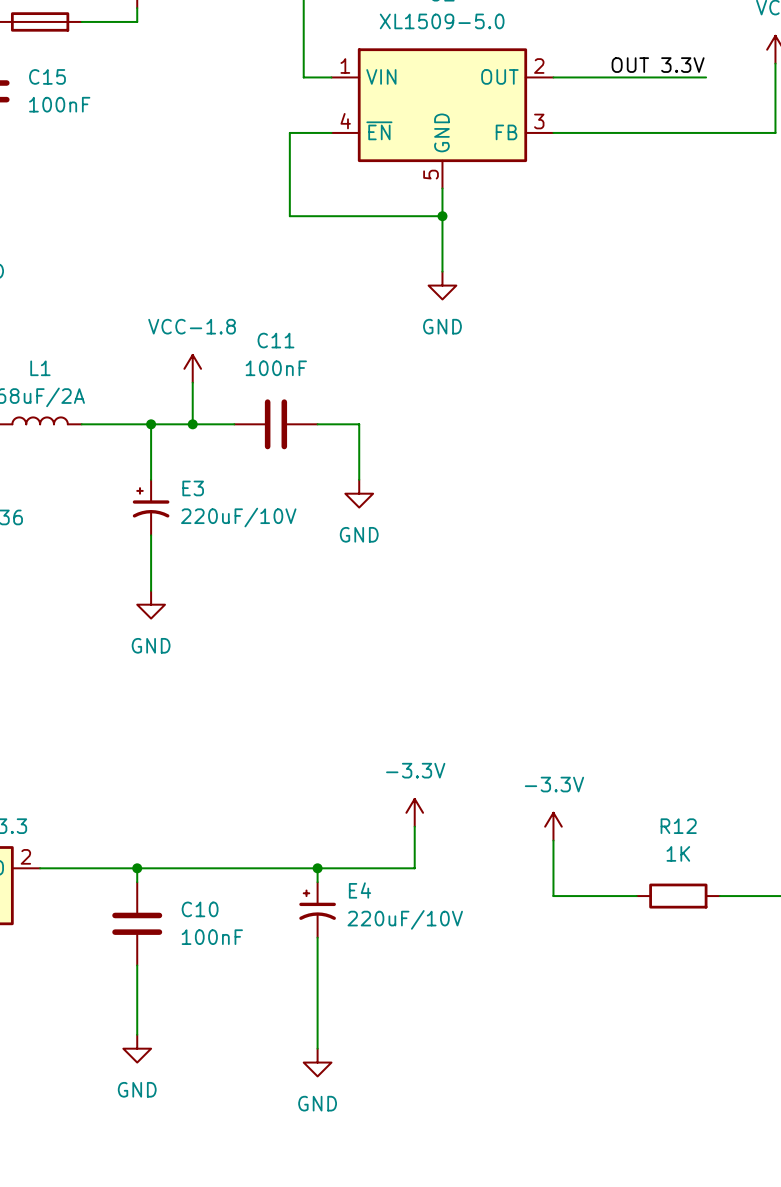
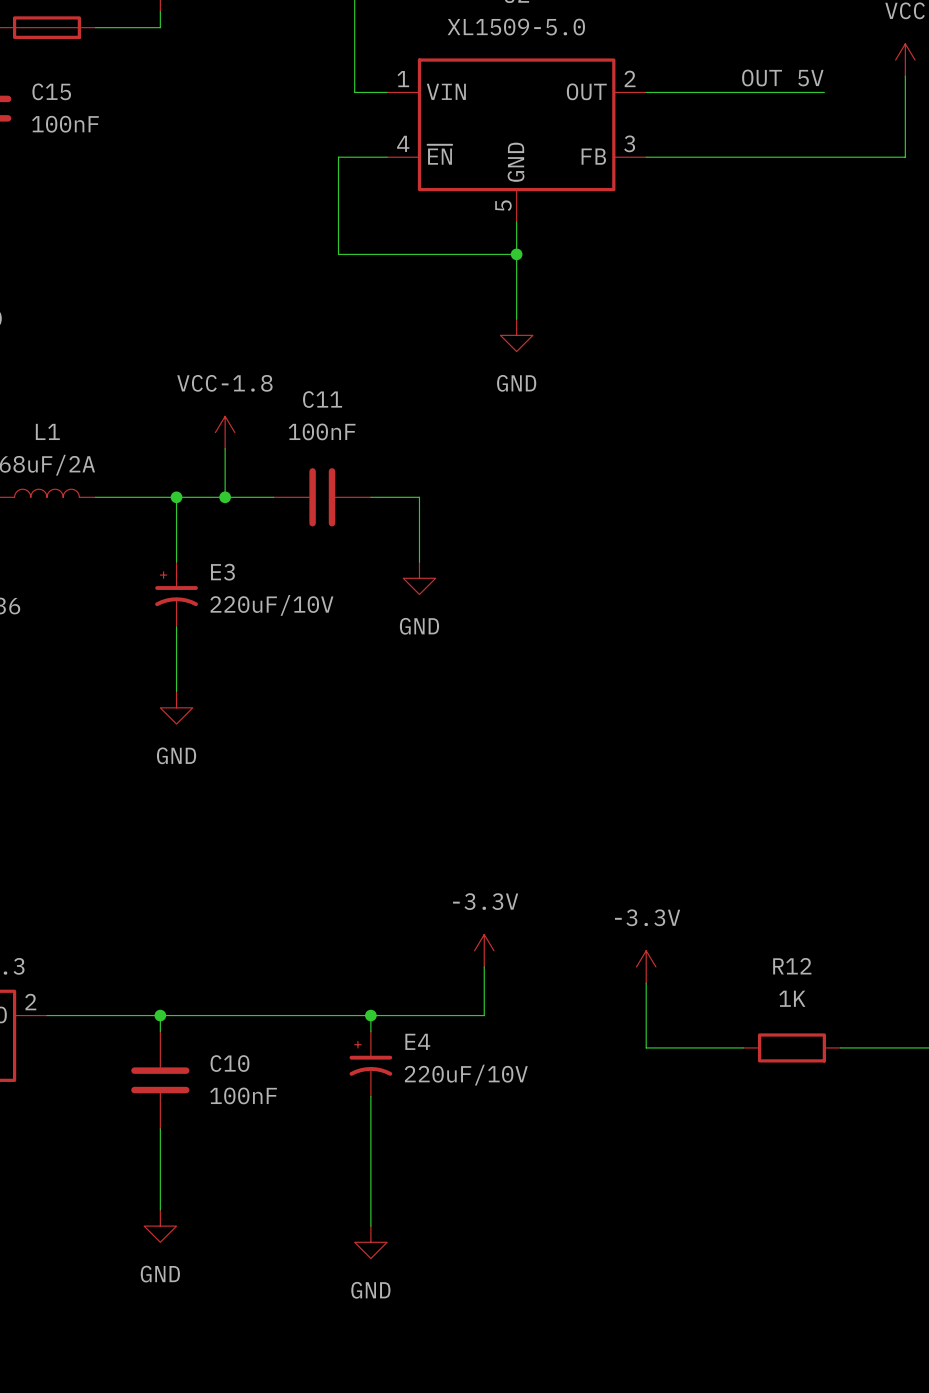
label: OUT 3.3V (658, 65) -> OUT 5V (782, 77)

